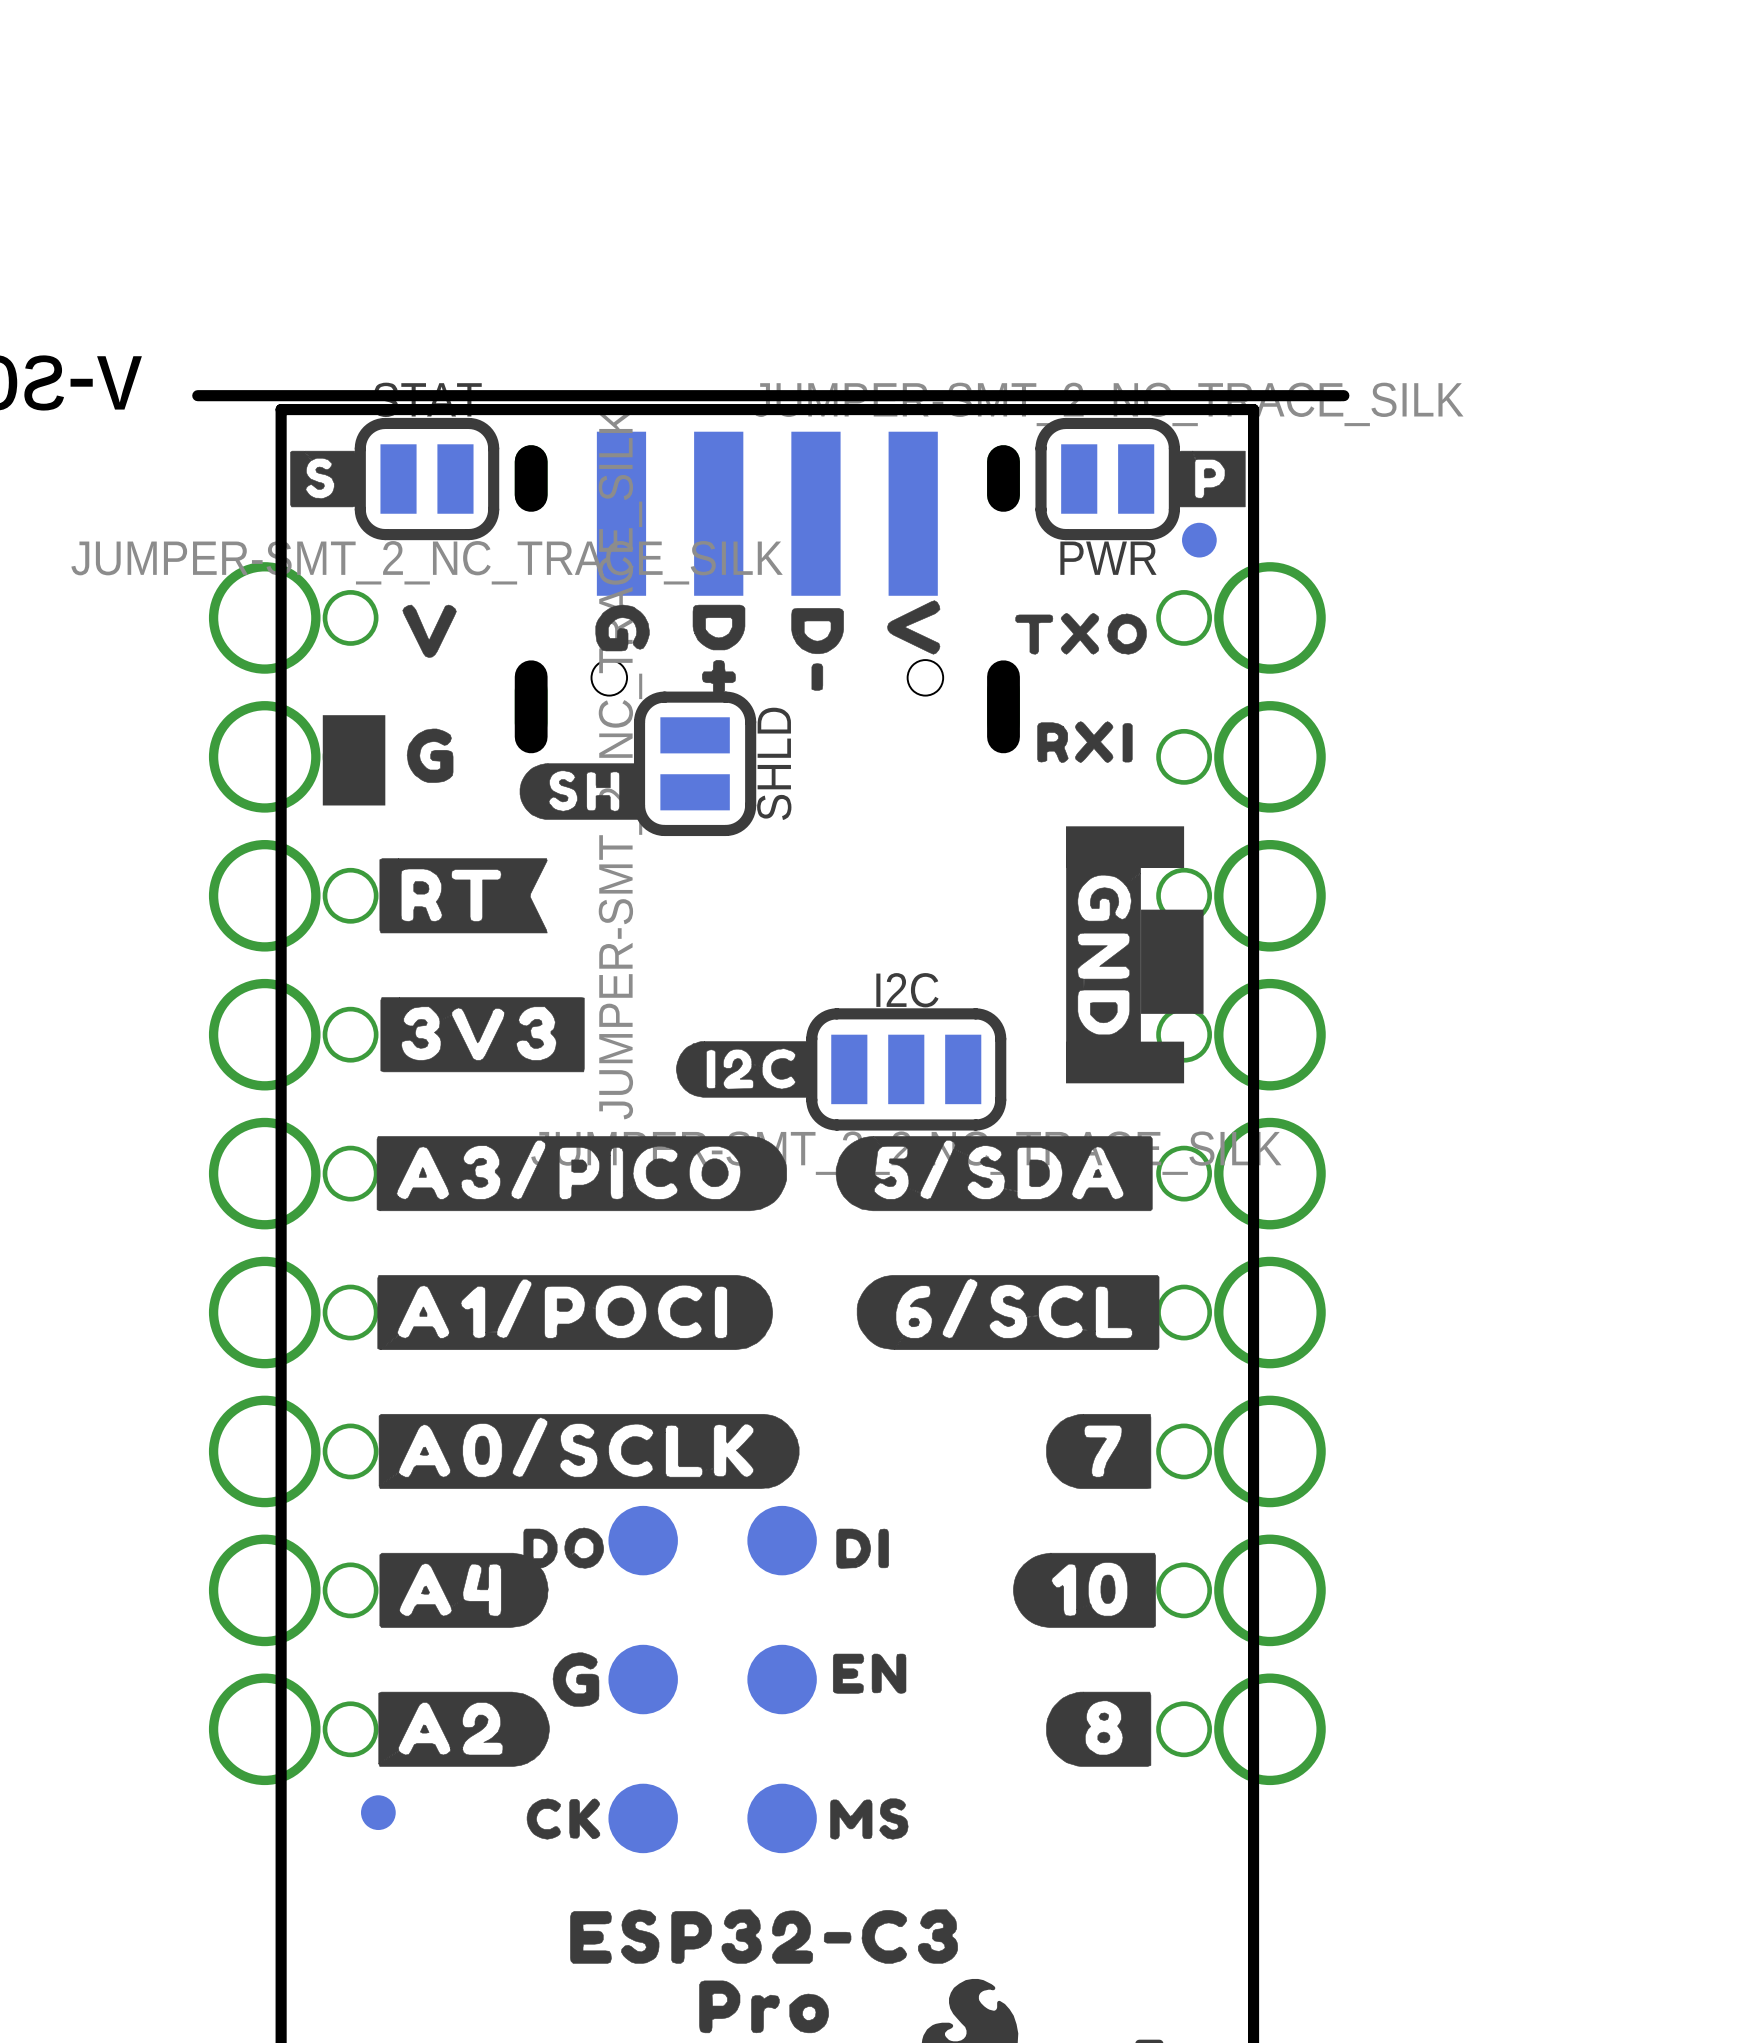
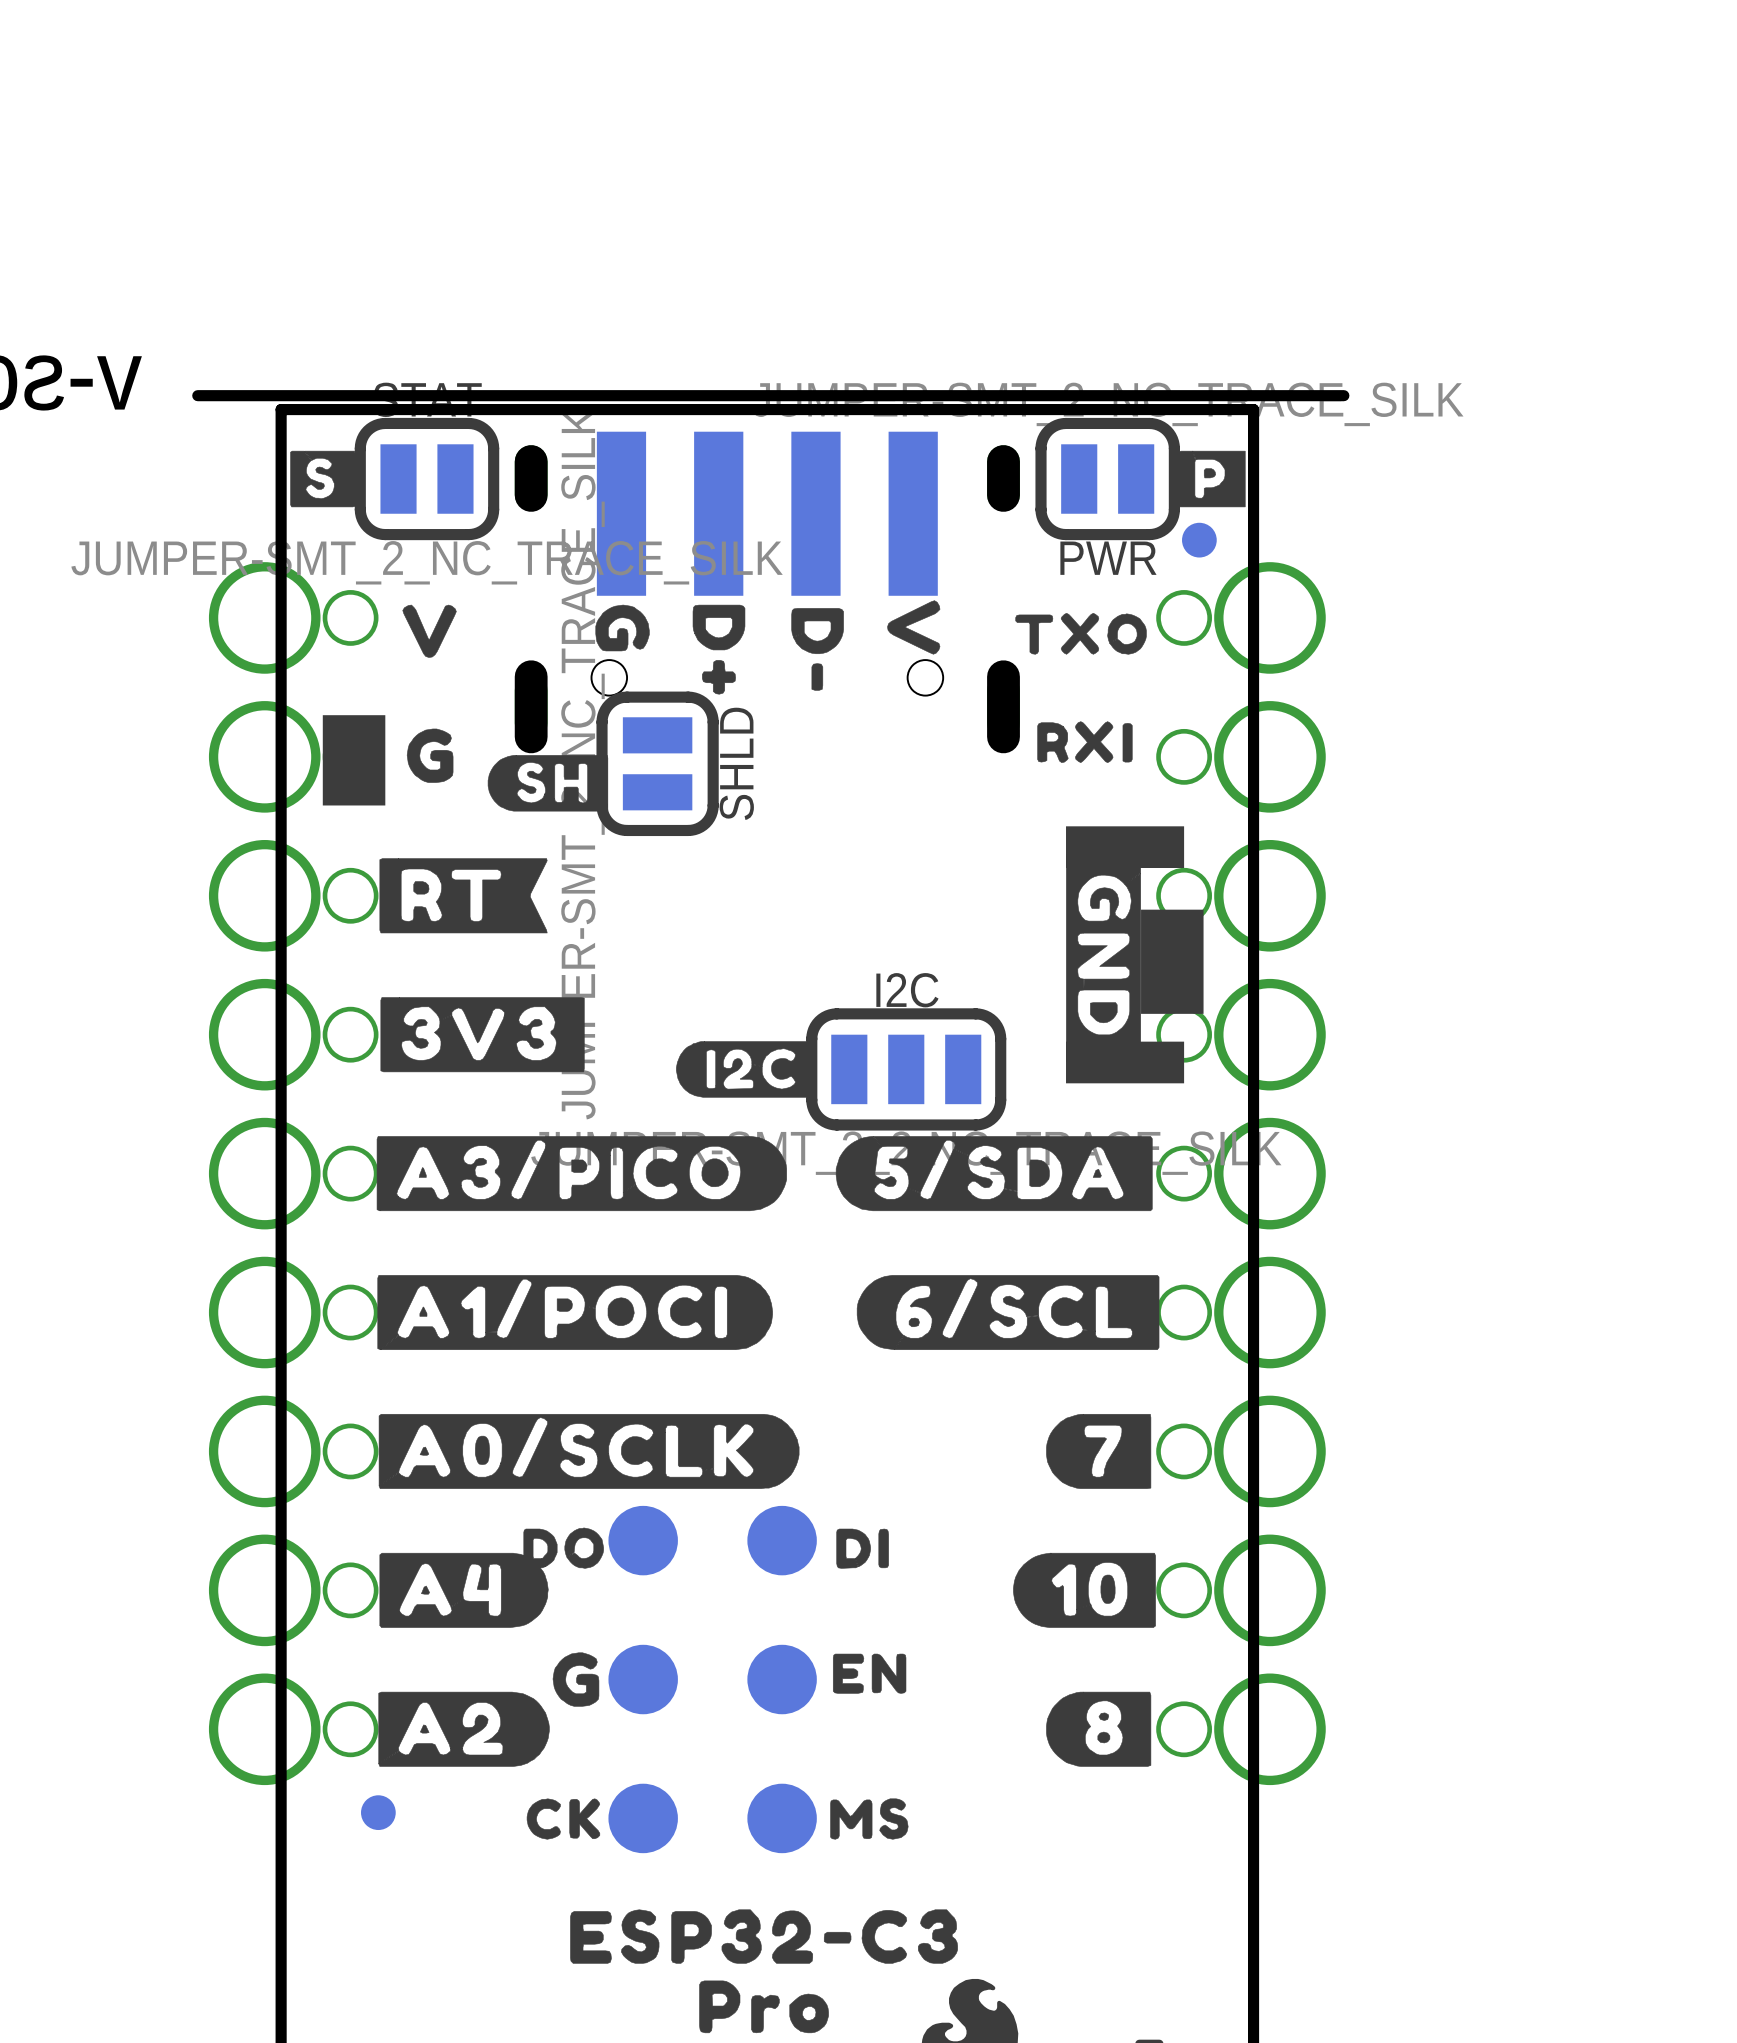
SHLD position: (695, 763) -> (657, 763)
drawing position: (579, 791) -> (547, 783)

